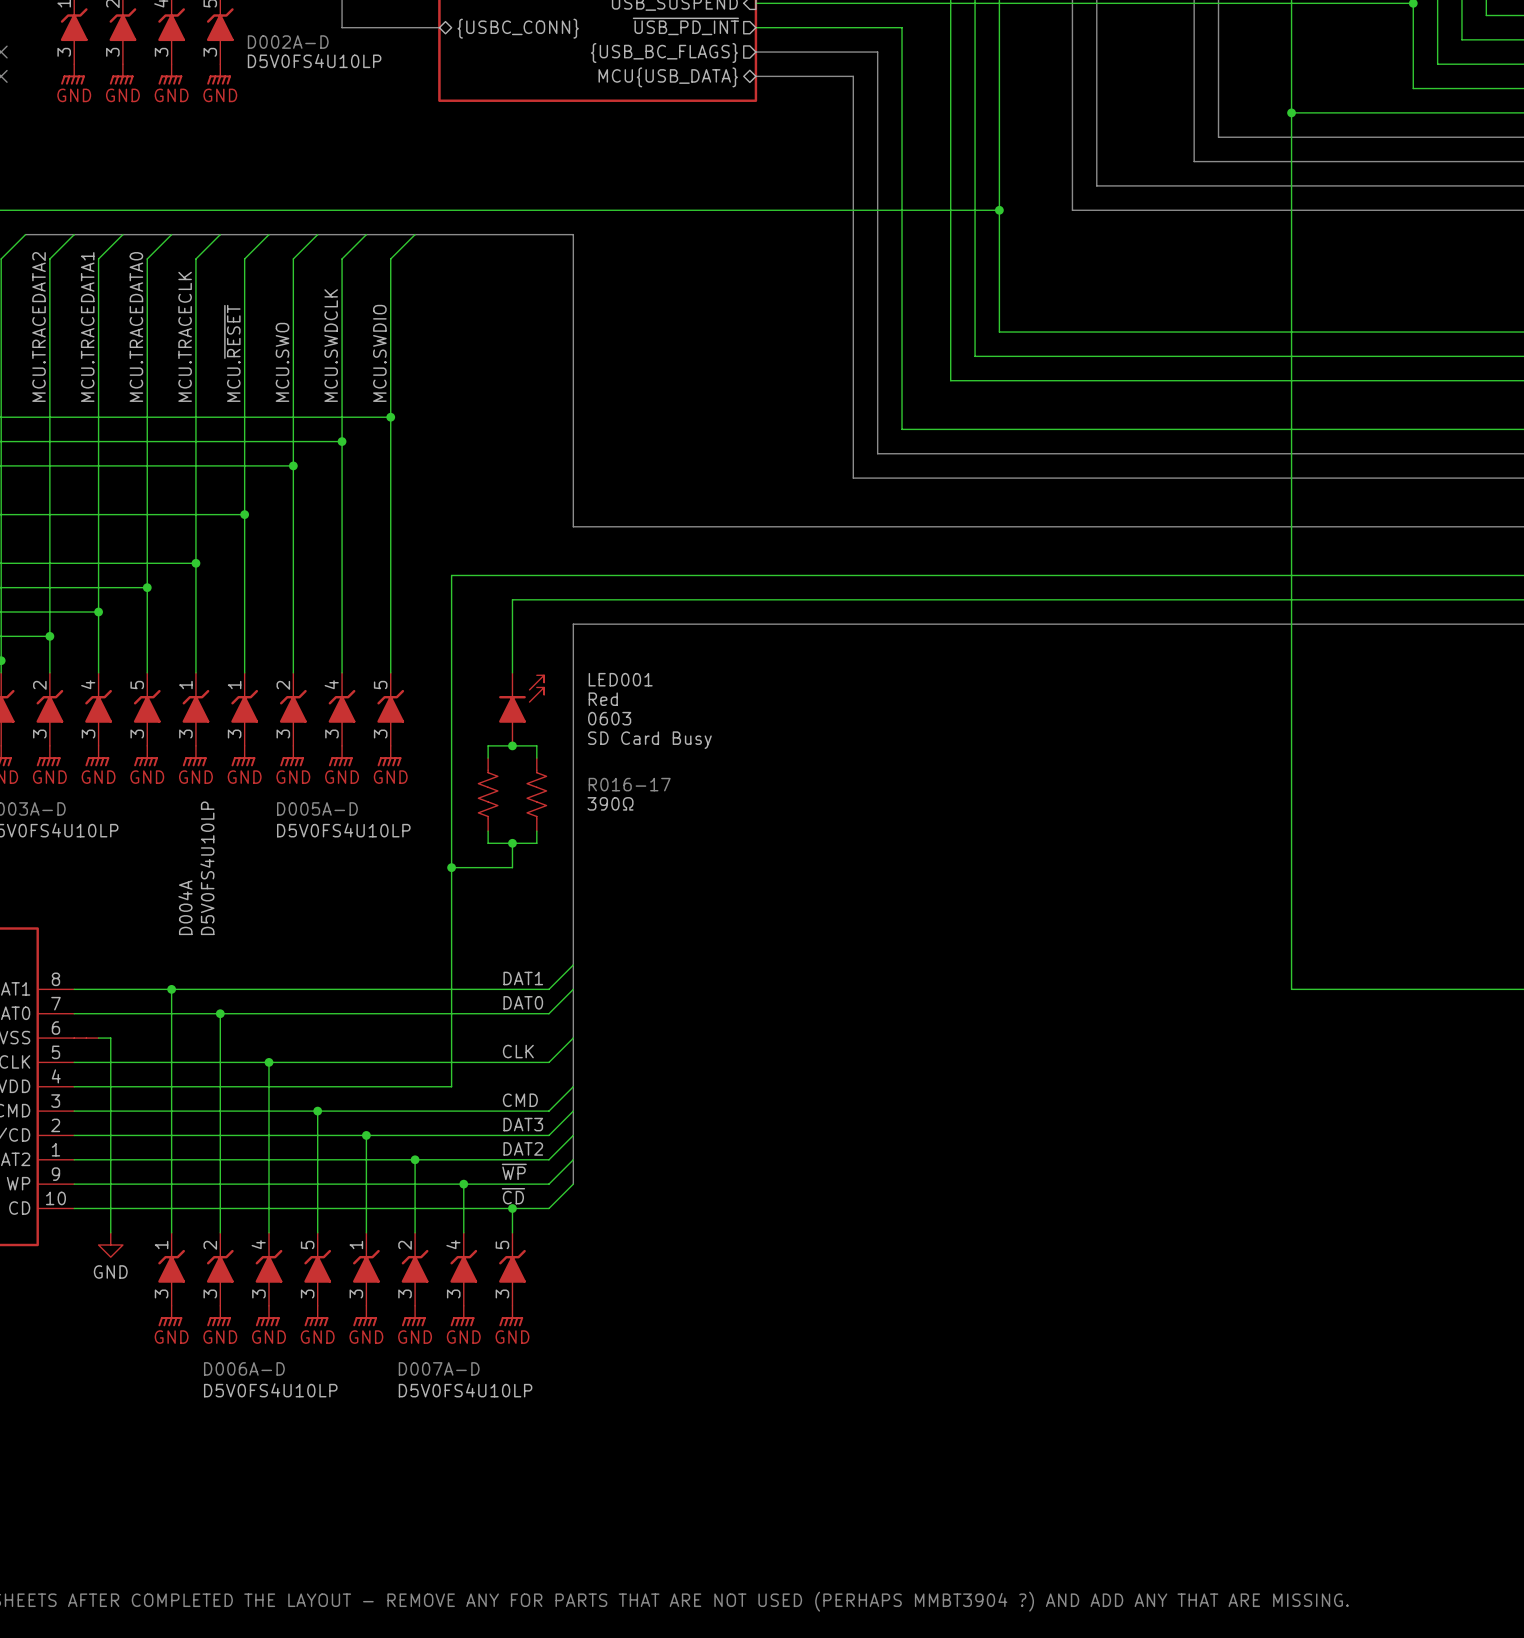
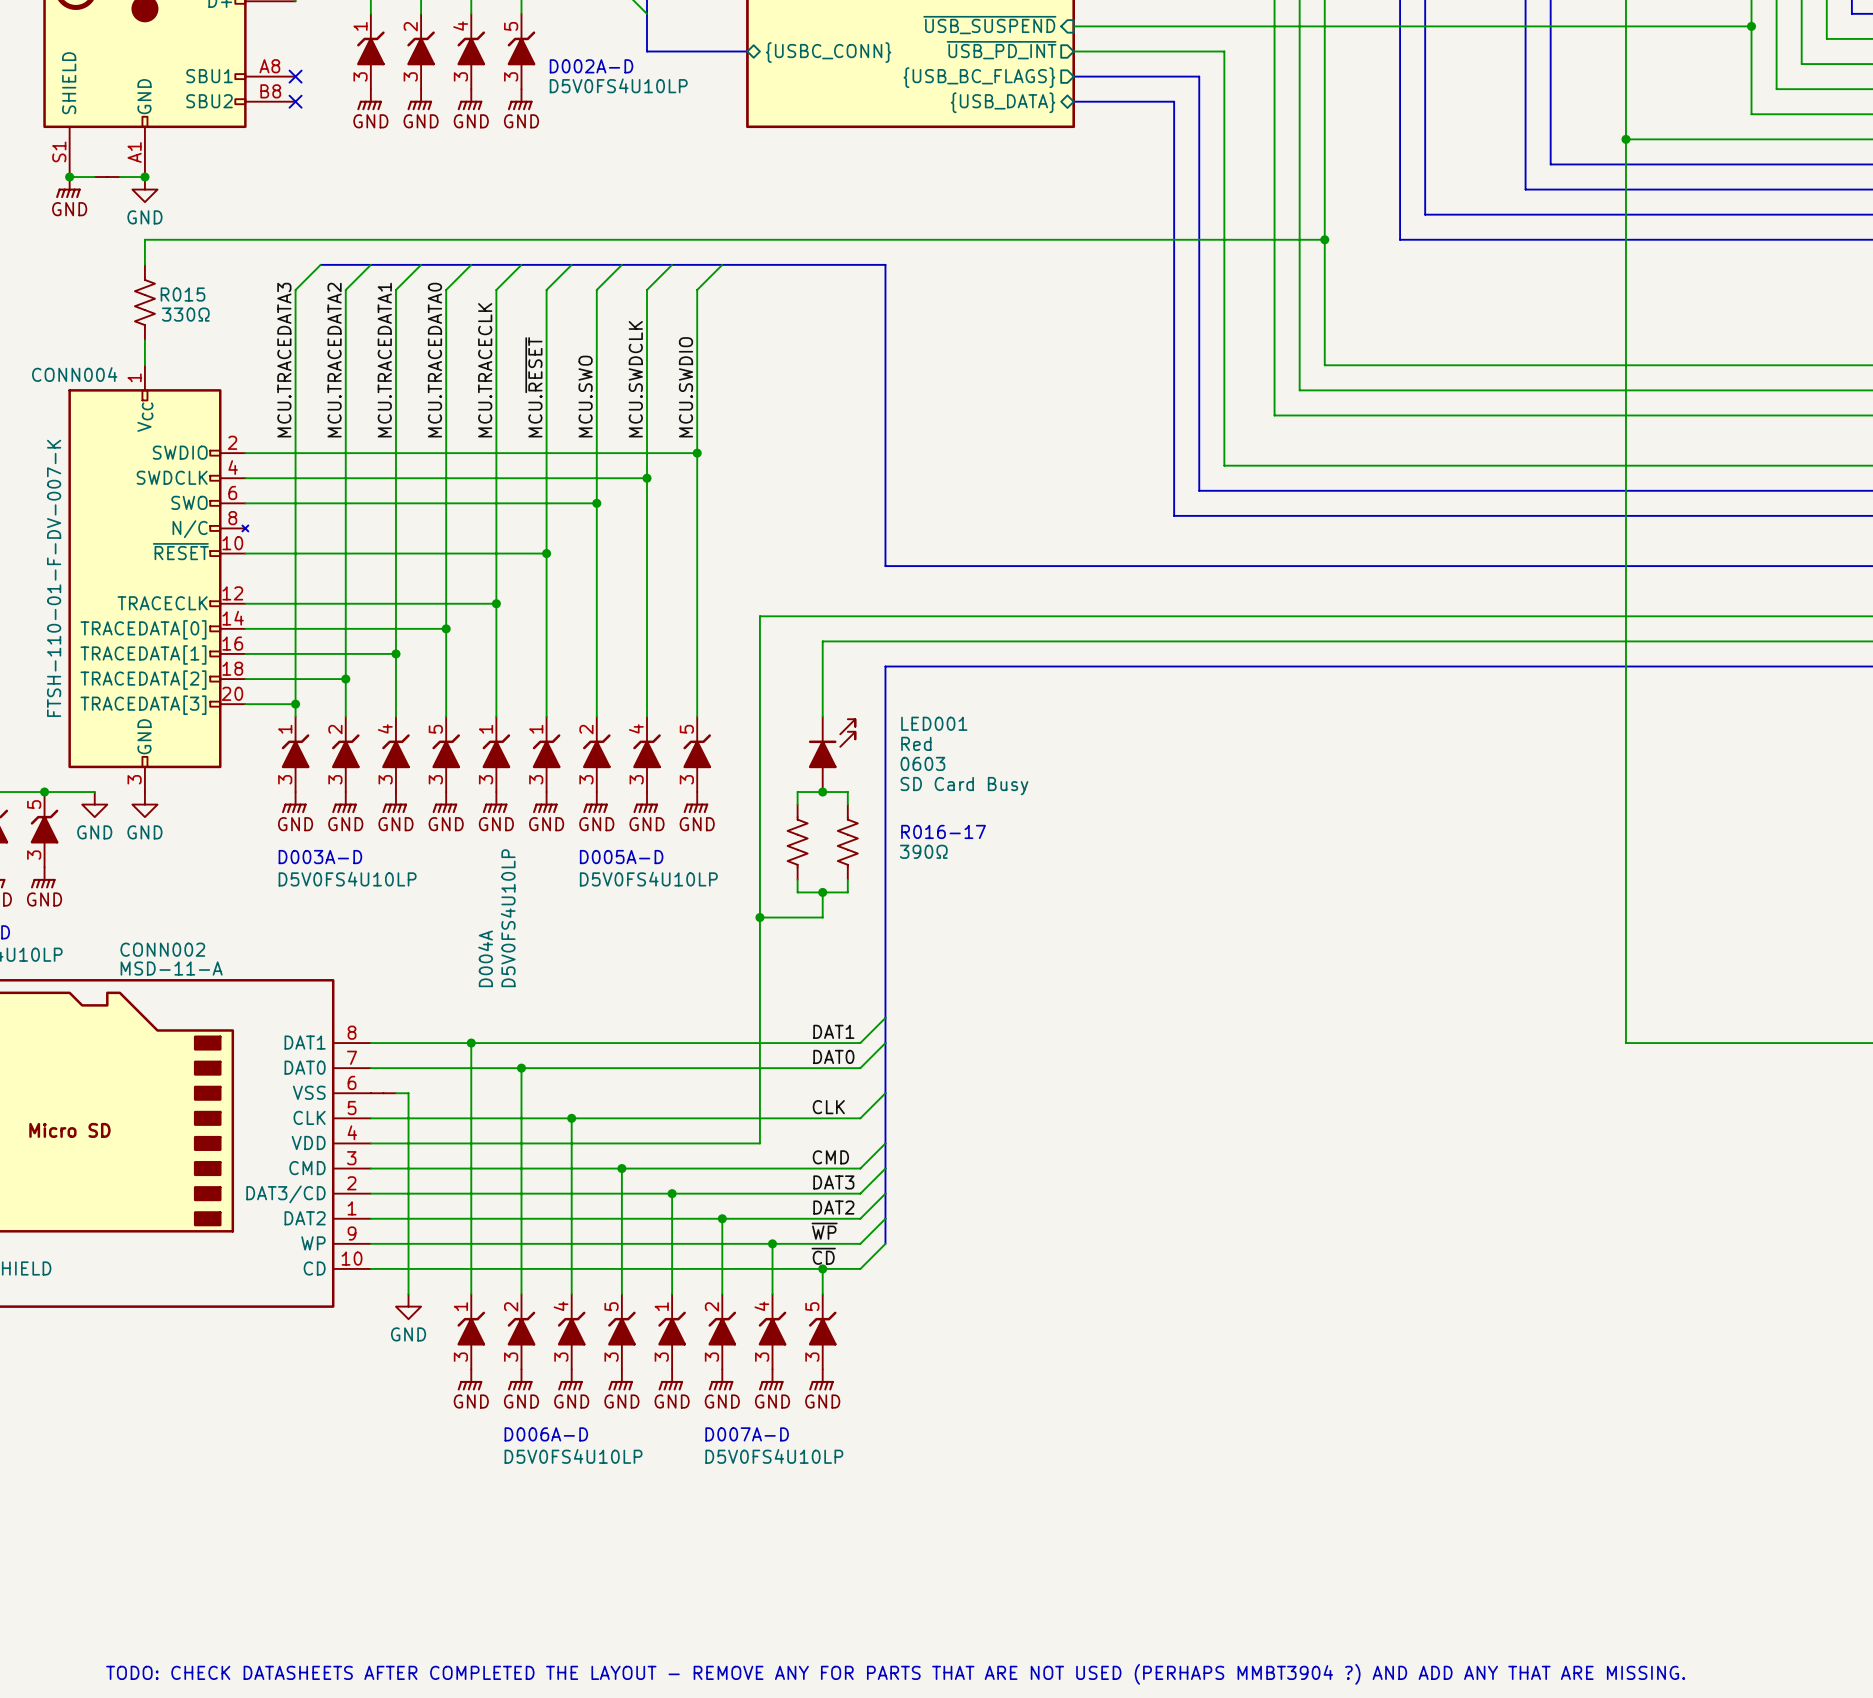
sheet pin: MCU{USB_DATA} (668, 77) -> {USB_DATA} (1003, 102)

